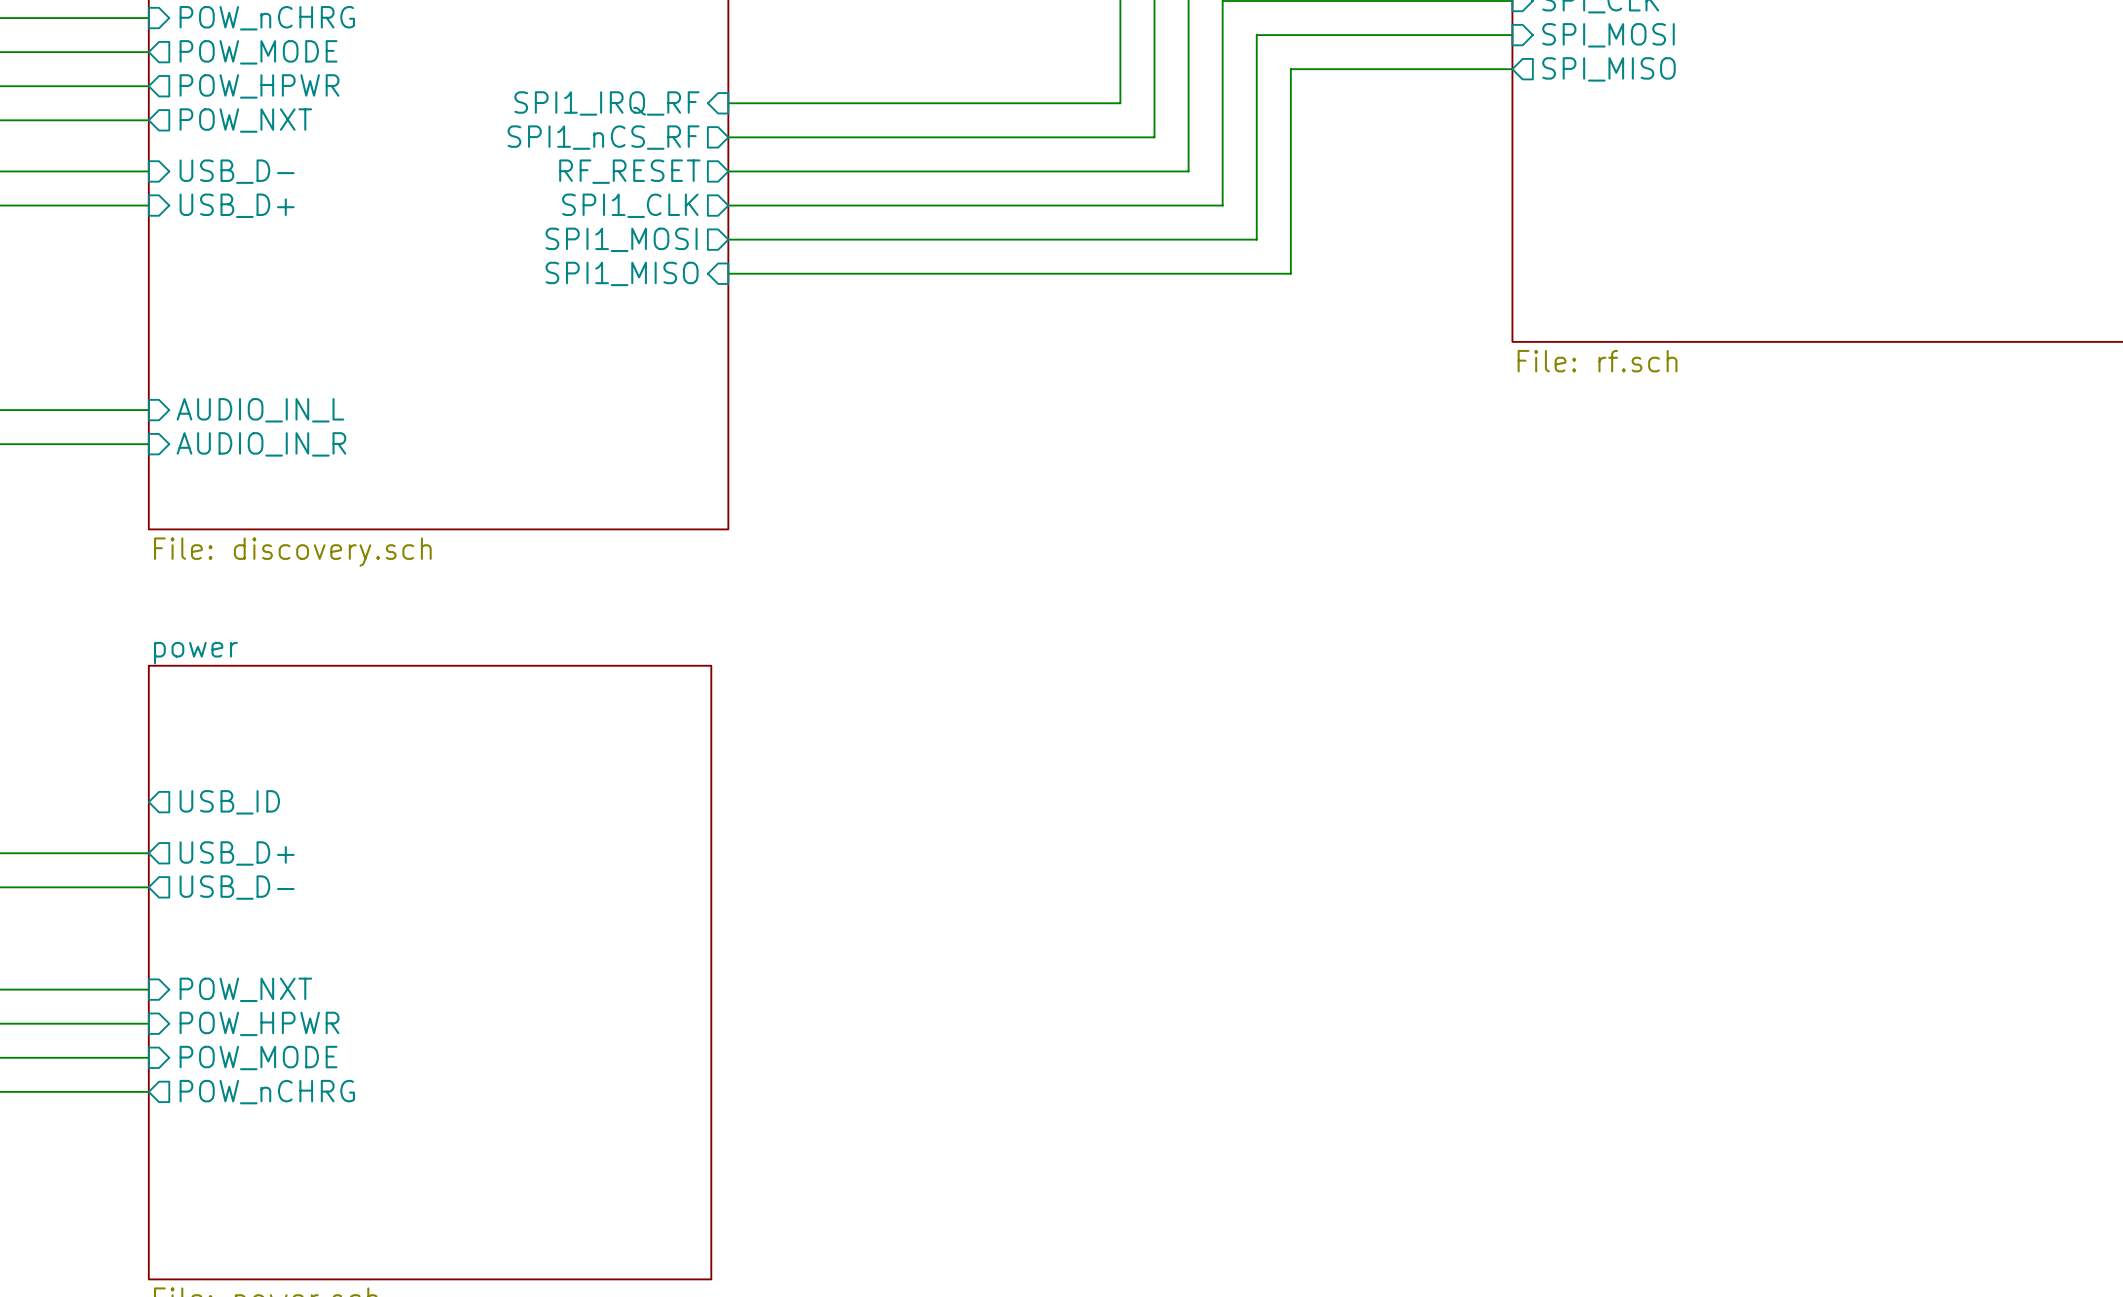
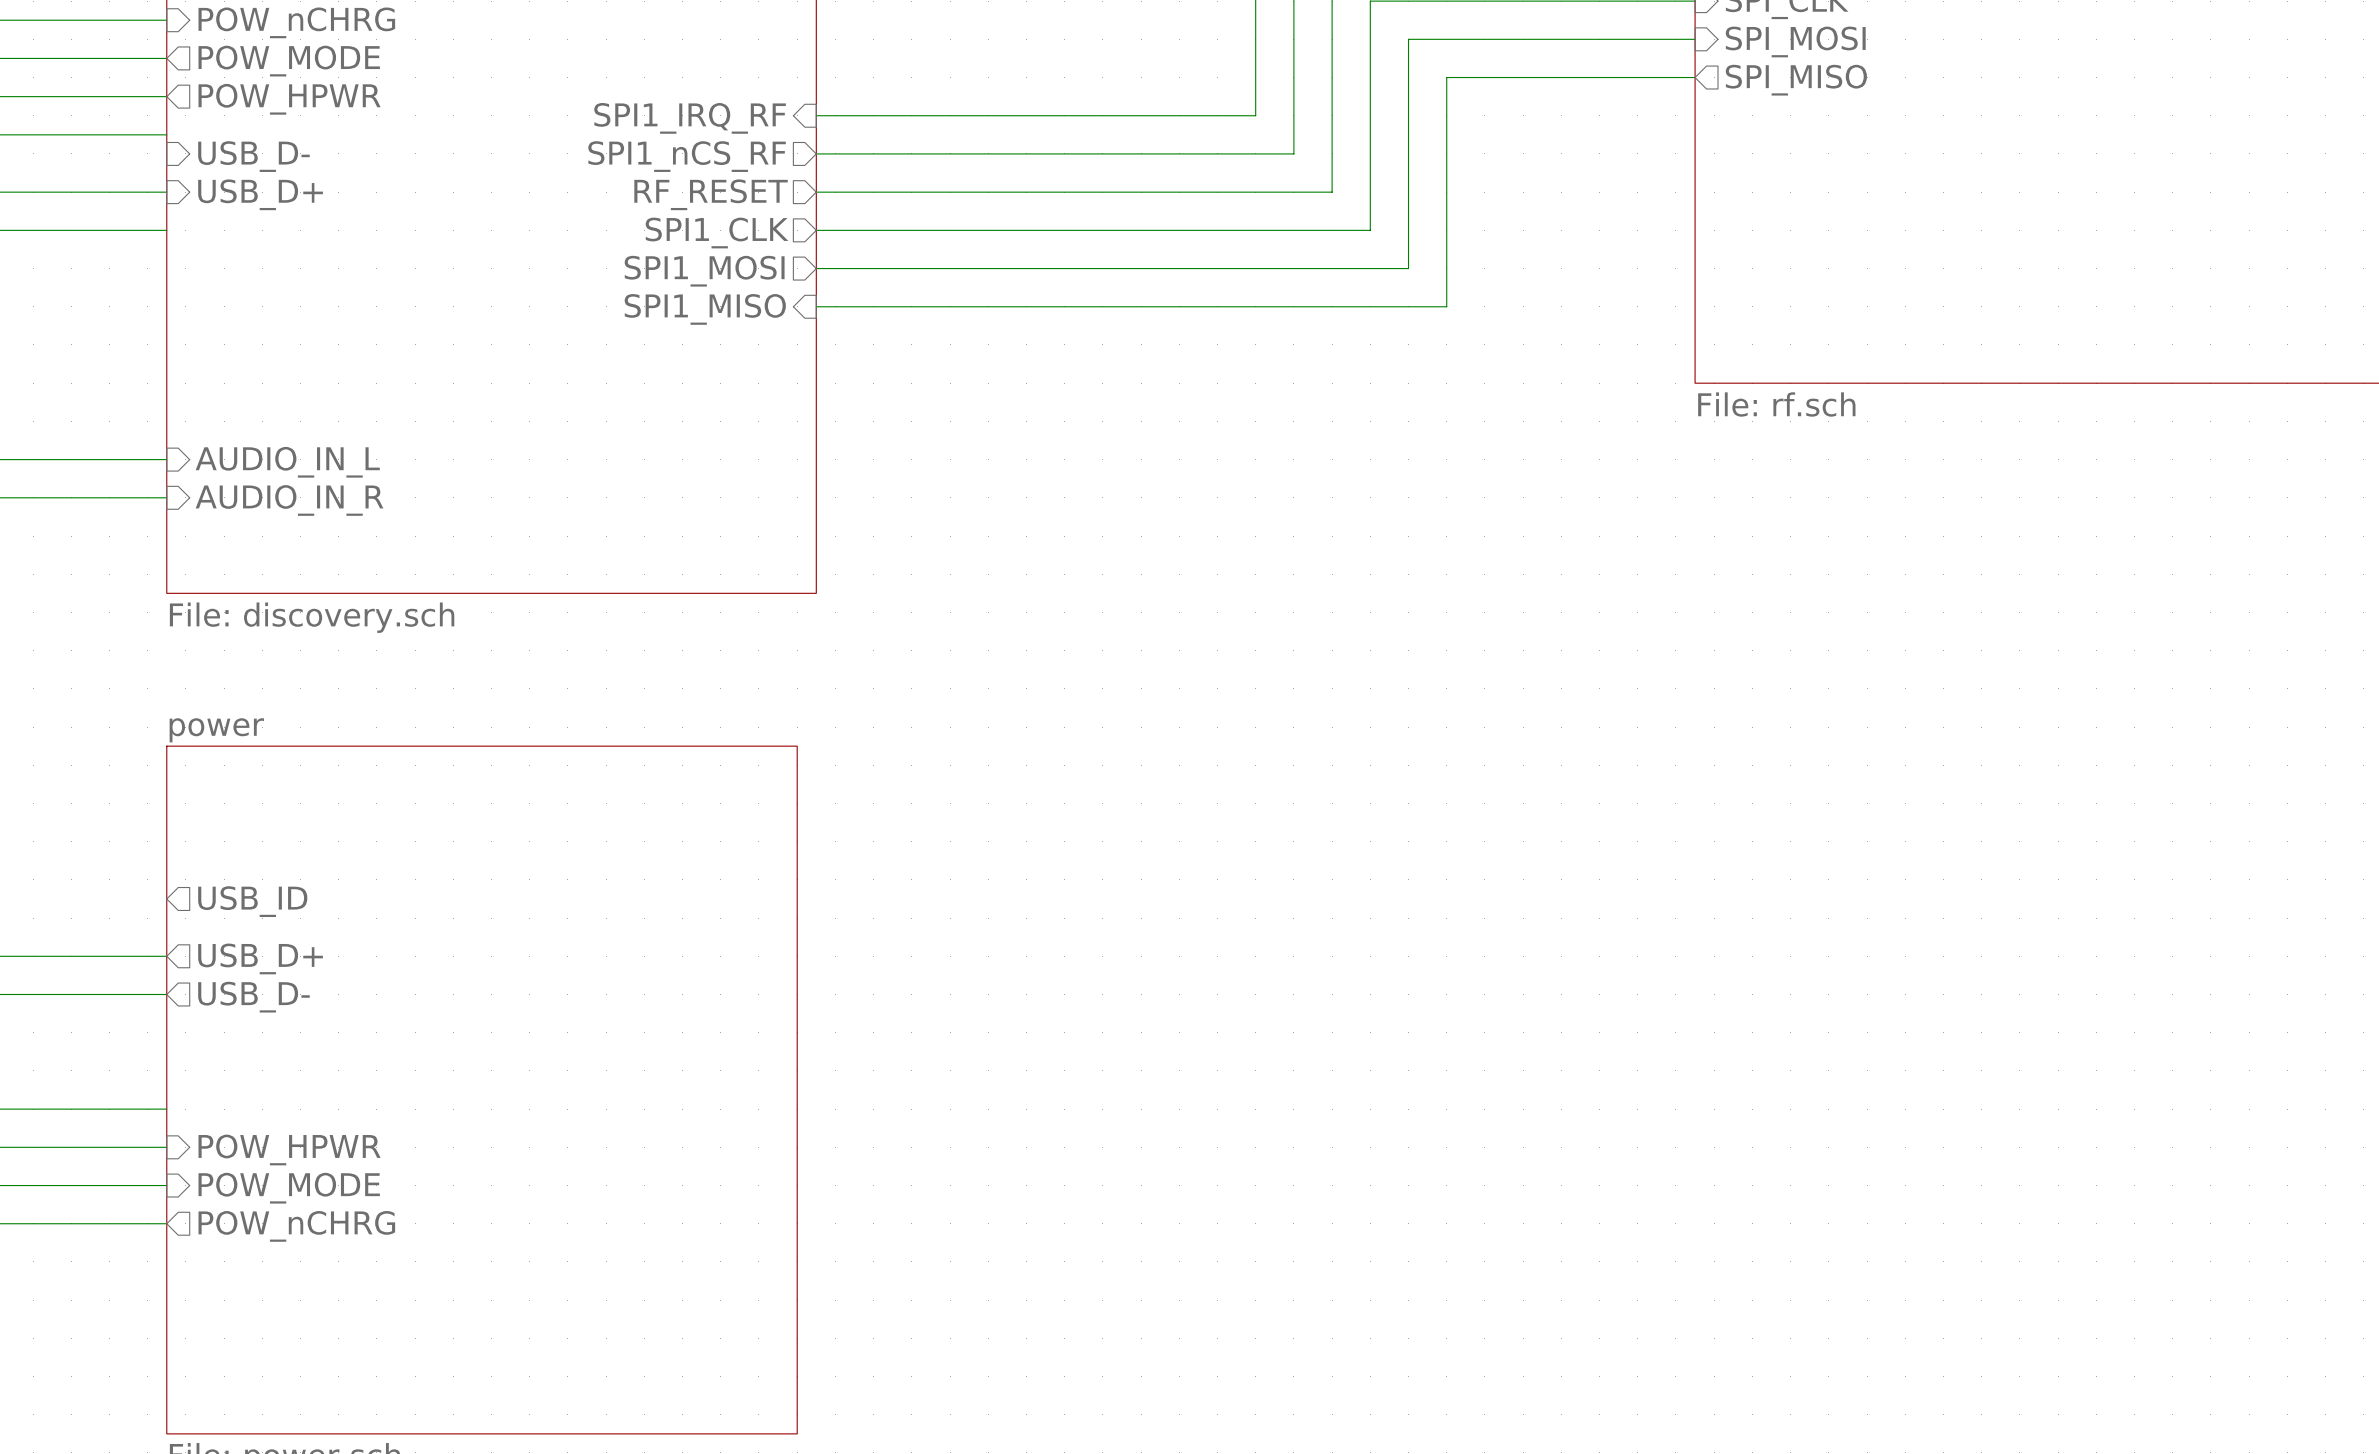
sheet pin: POW_NXT (245, 120) -> none
sheet pin: none -> USB_D- (253, 156)
sheet pin: USB_D- (237, 171) -> USB_D+ (260, 194)
sheet pin: USB_D+ (237, 205) -> none
sheet pin: POW_NXT (245, 989) -> none

